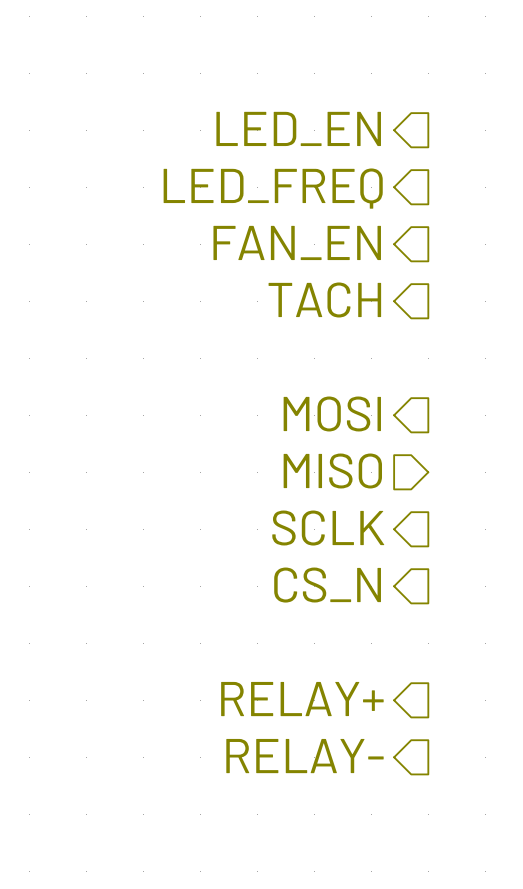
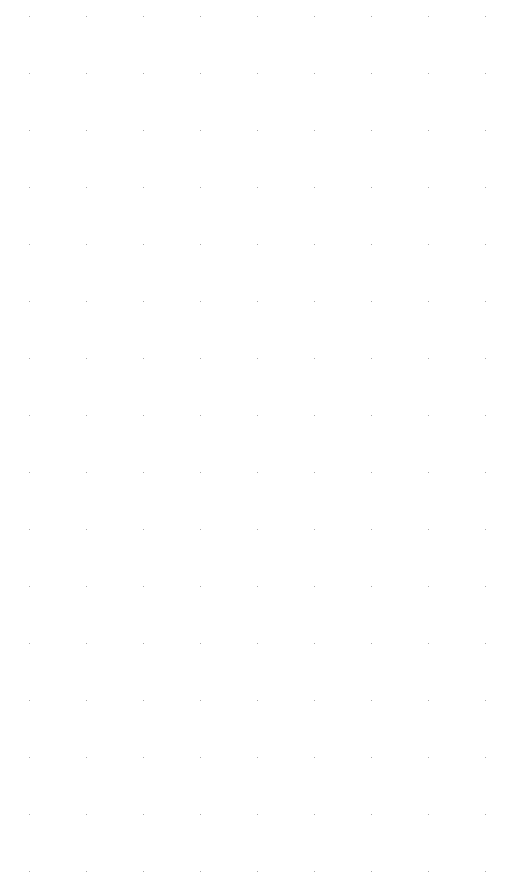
hierarchical label: LED_EN (298, 128) -> none
hierarchical label: LED_FREQ (273, 188) -> none
hierarchical label: FAN_EN (297, 242) -> none
hierarchical label: TACH (324, 300) -> none
hierarchical label: MOSI (332, 413) -> none
hierarchical label: MISO (332, 471) -> none
hierarchical label: SCLK (328, 528) -> none
hierarchical label: CS_N (327, 585) -> none
hierarchical label: RELAY+ (302, 699) -> none
hierarchical label: RELAY- (304, 756) -> none

